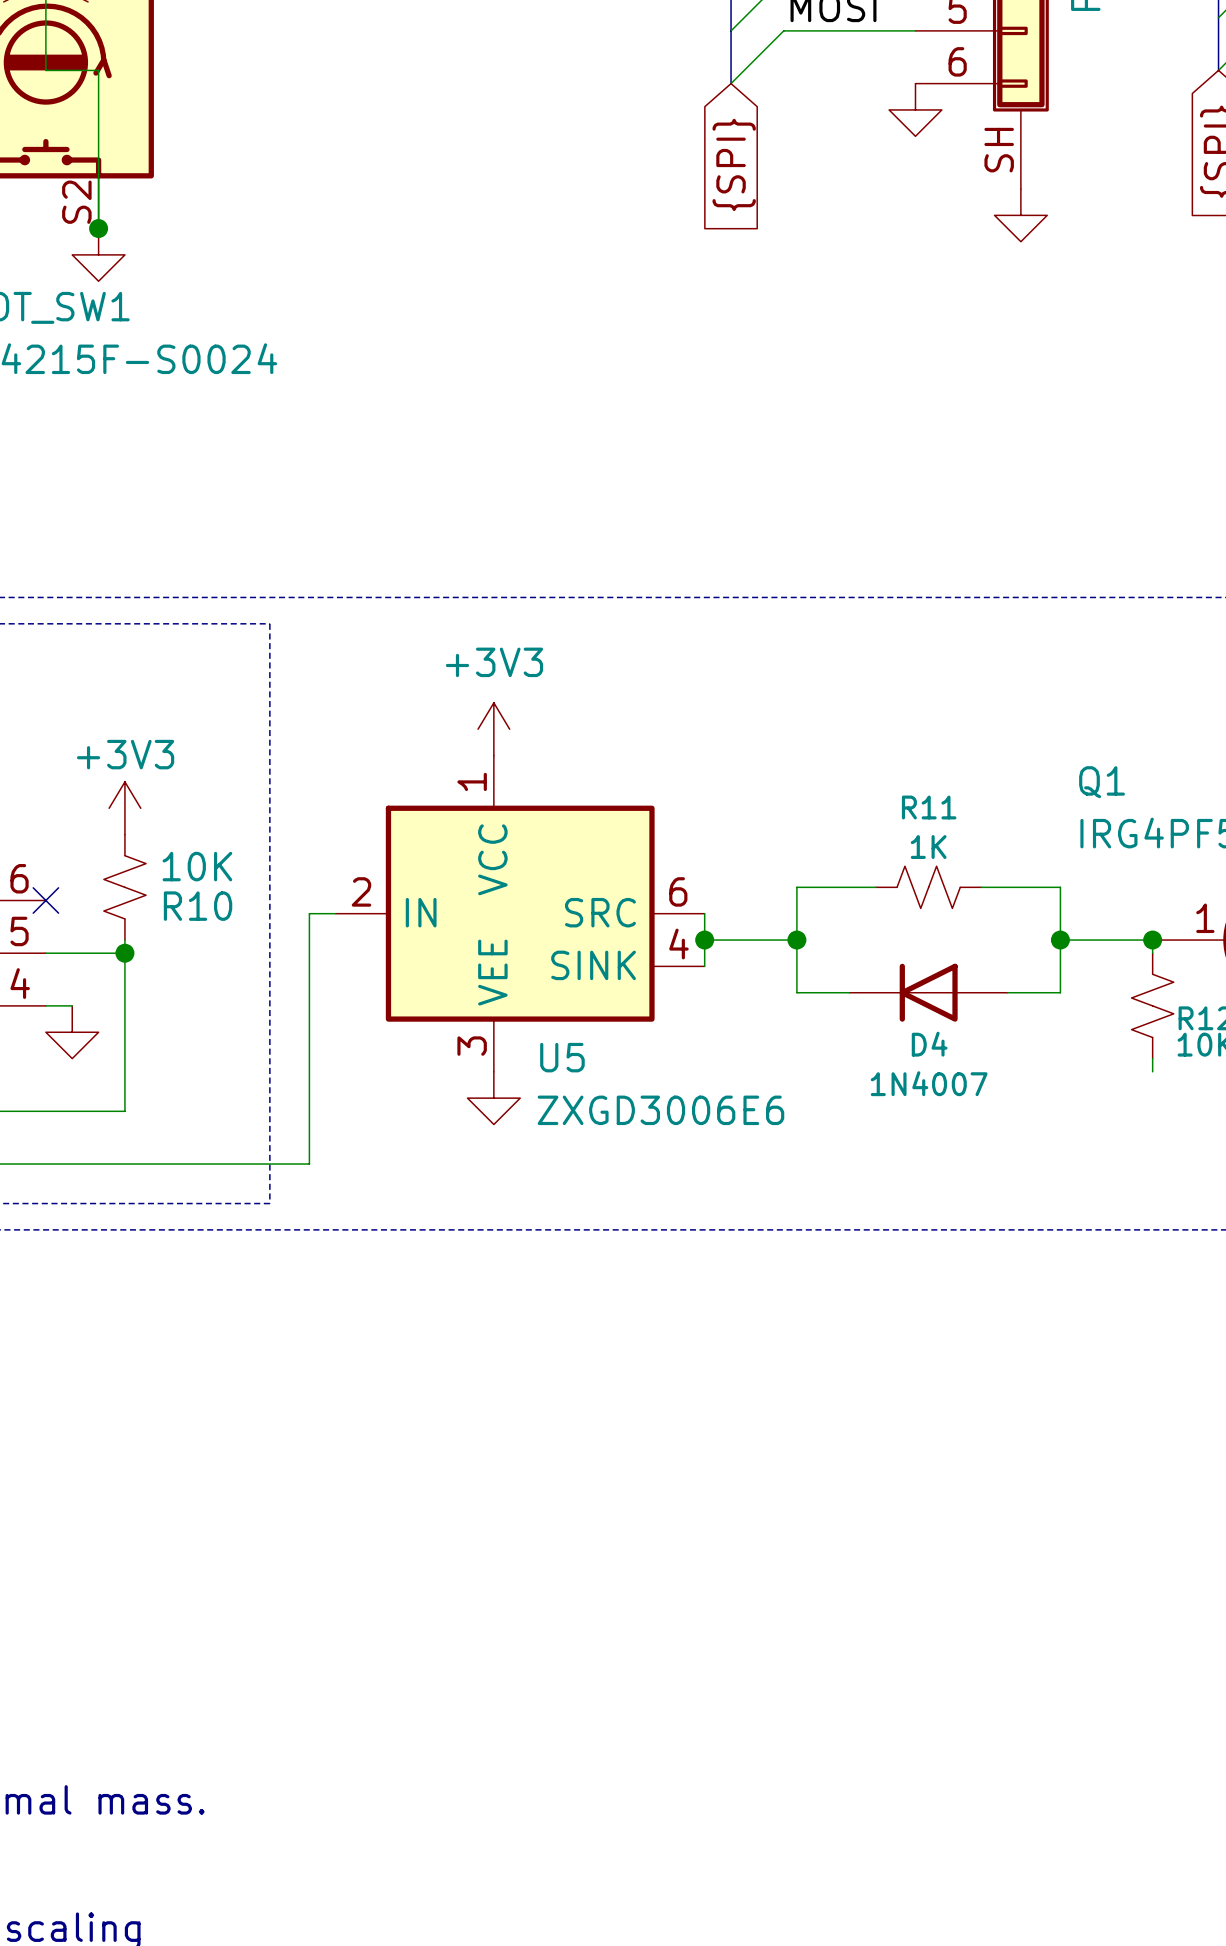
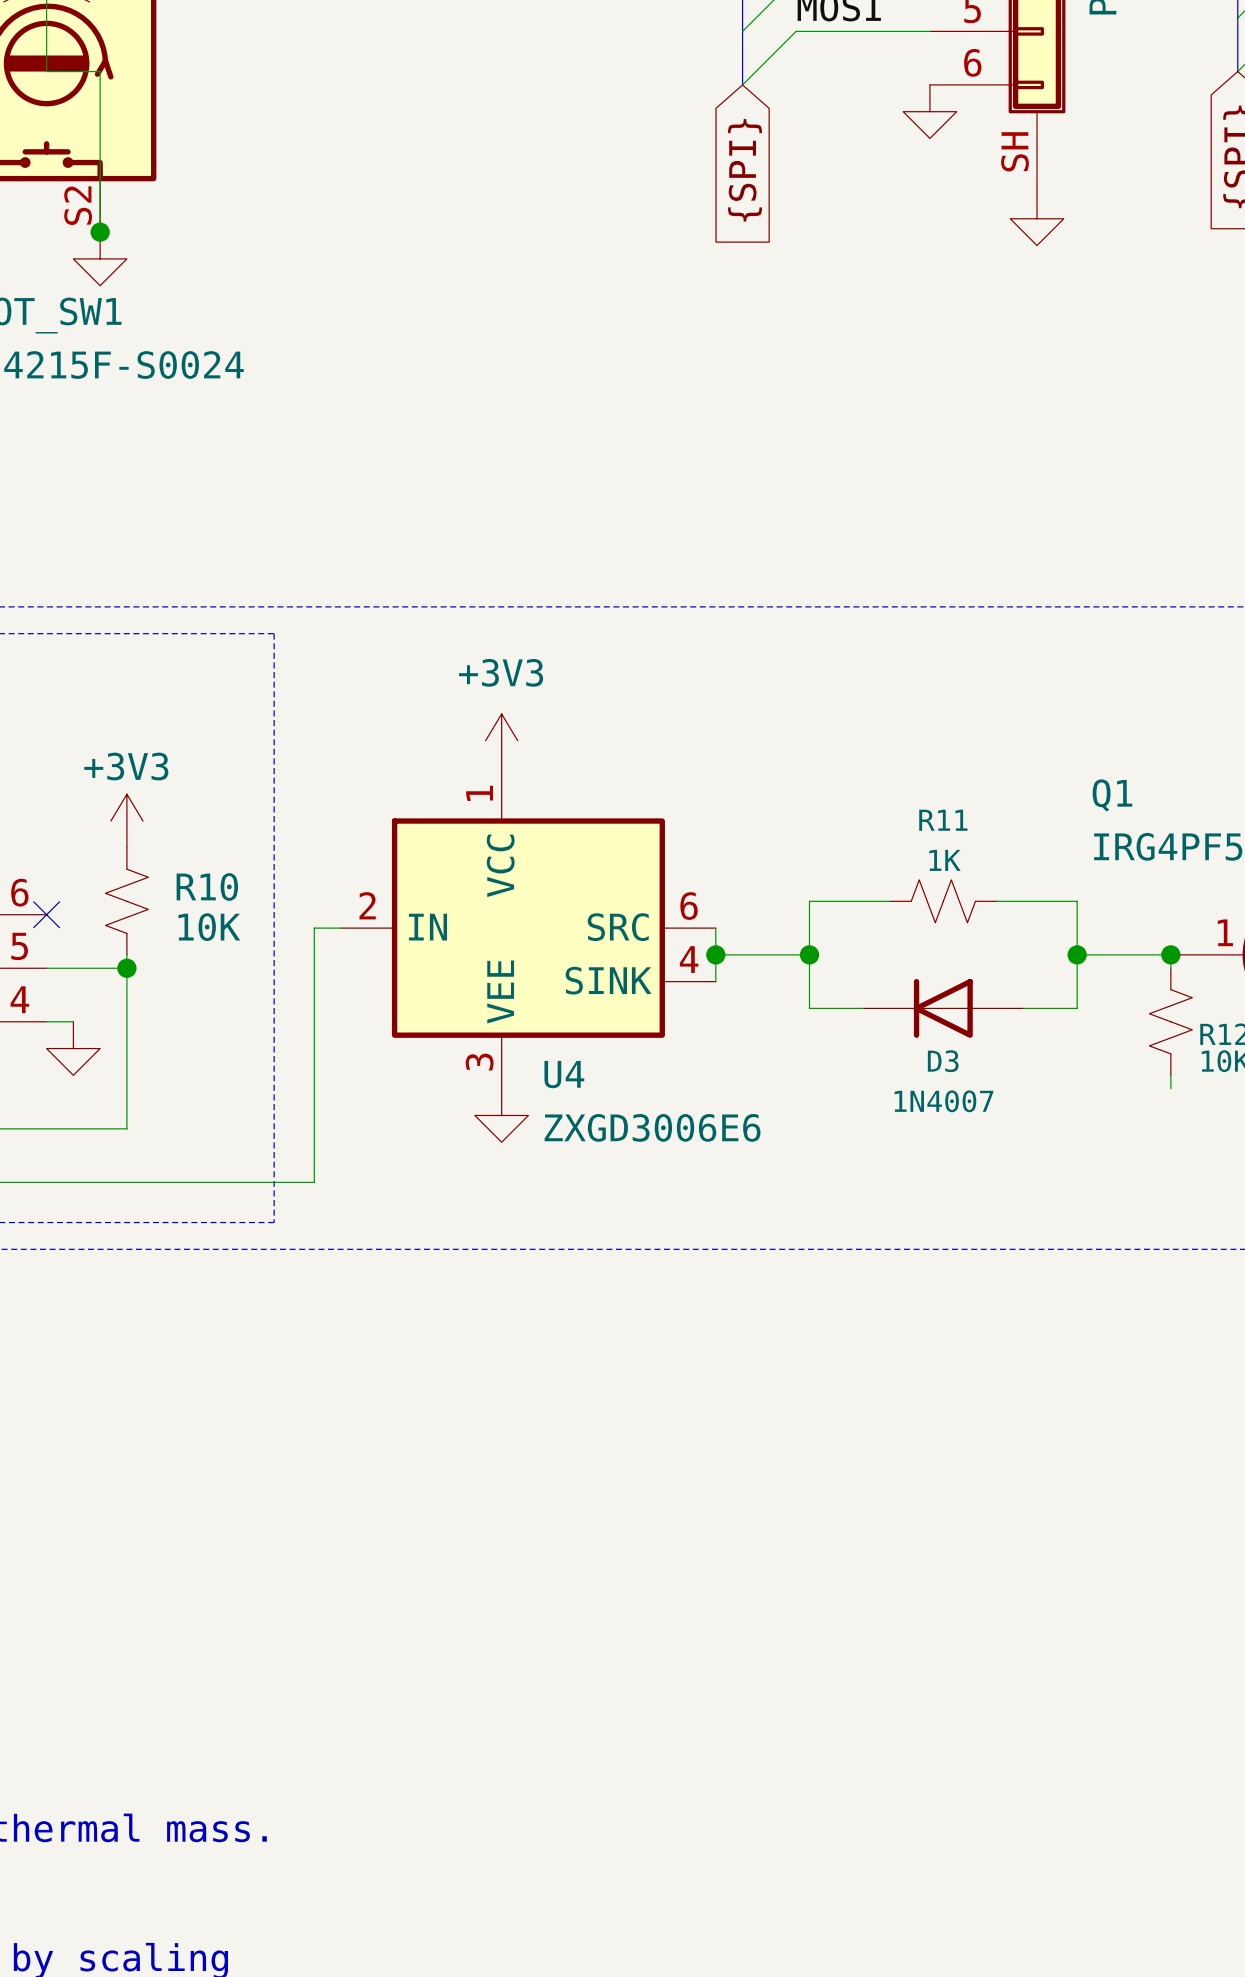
R10 value position: 10K (197, 866) -> 10K (209, 927)
R10 name position: R10 (198, 906) -> R10 (207, 886)
D4 name: D4 (929, 1044) -> D3 (943, 1061)
U5 name: U5 (562, 1057) -> U4 (564, 1074)

